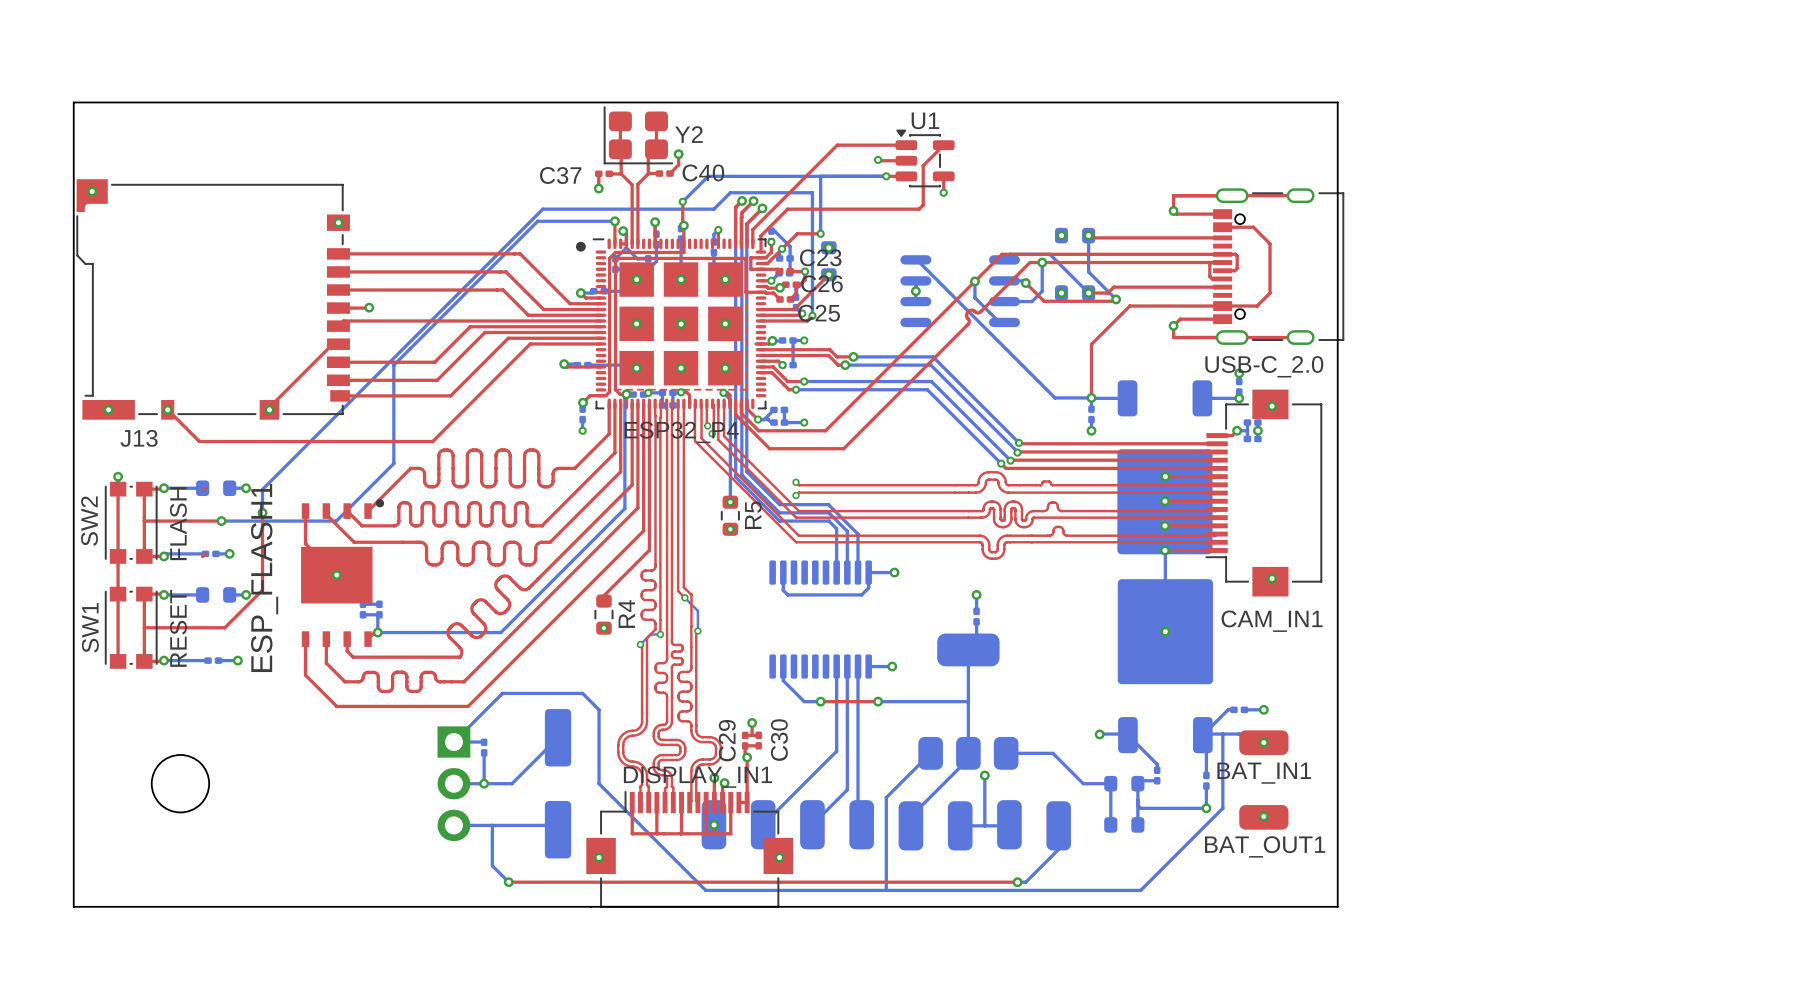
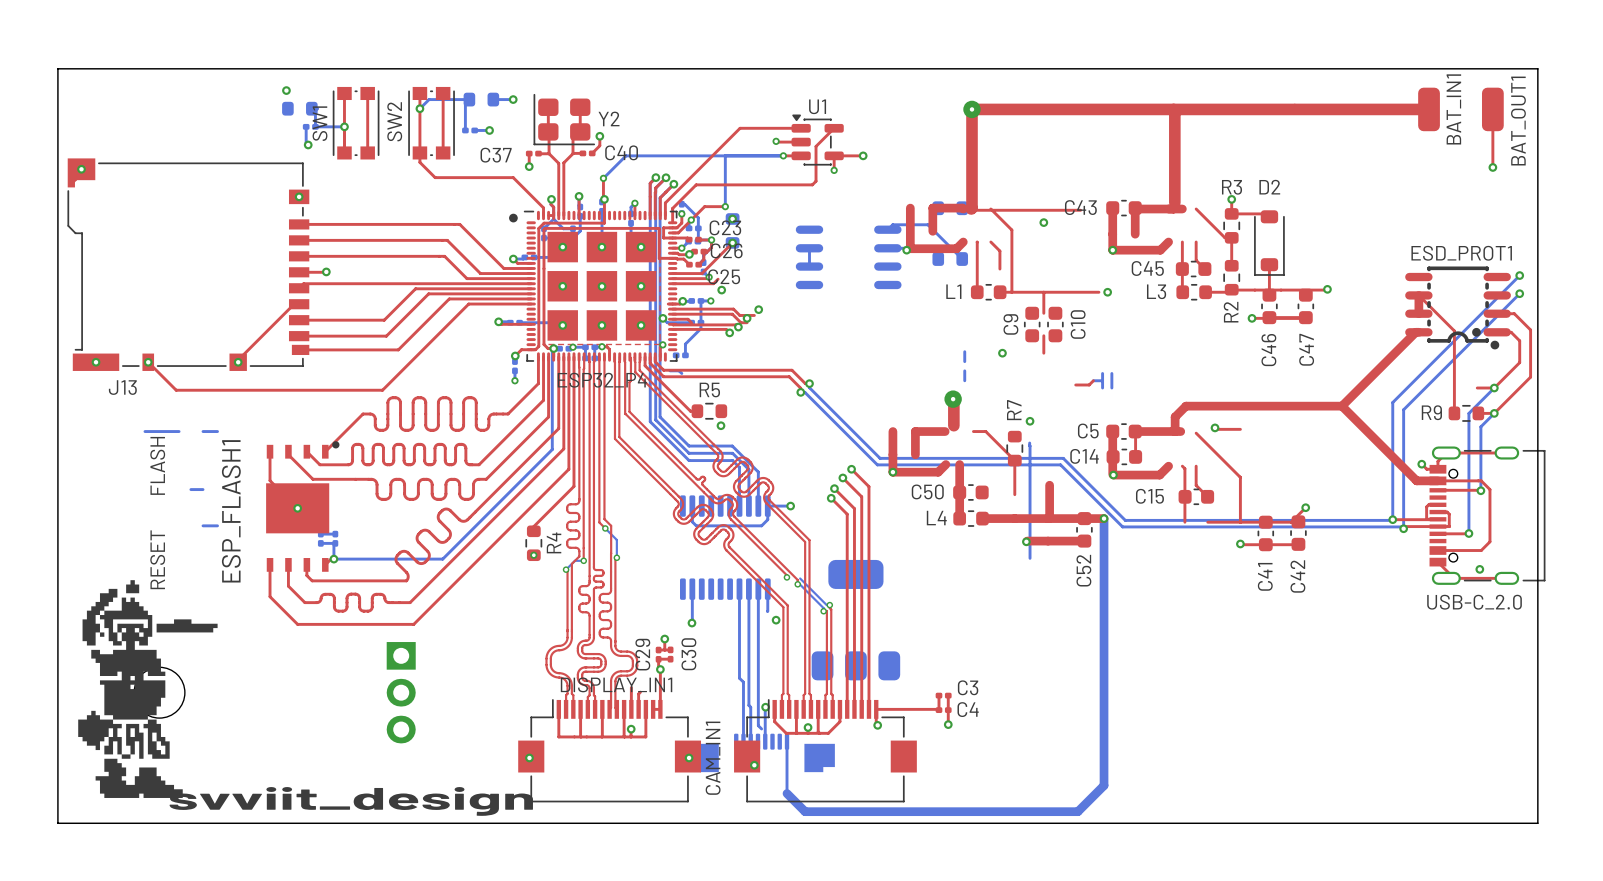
board edge: (73, 102) (73, 906) (1337, 906) (1337, 102) (73, 102) -> (57, 68) (57, 823) (1537, 823) (1537, 68) (57, 68)
via: none -> (286, 90)
top track: none -> (344, 93) (344, 152)
top track: none -> (367, 93) (367, 152)
top track: none -> (443, 93) (443, 152)
part: none -> (481, 99)
bottom track: none -> (493, 99) (513, 99)
via: none -> (513, 99)
part: none -> (299, 108)
bottom track: none -> (317, 108) (315, 110) (315, 126) (344, 126)
bottom track: none -> (419, 108) (429, 99) (469, 99) (465, 103) (465, 130)
via: none -> (419, 108)
via: none -> (971, 109)
top track: none -> (1173, 109) (1174, 202)
top track: none -> (1298, 109) (1429, 109) (971, 109) (971, 209)
top track: none -> (1492, 123) (1492, 167)
bottom track: none -> (306, 126) (306, 142) (308, 144)
part: none -> (310, 126)
via: none -> (344, 126)
part: none -> (470, 130)
via: none -> (489, 130)
via: none -> (308, 144)
top track: none -> (834, 155) (863, 155)
via: none -> (863, 155)
via: none -> (1492, 167)
top track: (1300, 195) (1173, 195) (1173, 210) (1176, 214) (1222, 214) -> none
via: (1173, 210) -> none
top track: (614, 221) (614, 235) -> (419, 93) (419, 162) (435, 177) (513, 177) (543, 207)
bottom track: (614, 221) (537, 221) (393, 365) (393, 463) (336, 521) (221, 521) -> none
via: (614, 221) -> none
via: none -> (551, 199)
top track: none -> (1231, 199) (1231, 213) (1266, 213) (1269, 216)
via: none -> (1231, 199)
top track: (1222, 227) (1253, 227) (1270, 243) (1270, 293) (1257, 306) (1129, 306) (1091, 344) (1091, 397) -> none
via: (623, 231) -> none
top track: none -> (910, 208) (910, 248) (956, 248) (963, 242)
via: (1061, 235) -> none
bottom track: (1088, 235) (1088, 271) (1116, 299) -> none
via: (1088, 235) -> none
top track: none -> (1112, 208) (1112, 250) (1160, 250) (1168, 242)
C43: none -> (1123, 208)
top track: none -> (963, 209) (932, 208) (932, 231)
top track: none -> (990, 209) (1011, 230) (1011, 292)
top track: none -> (1182, 209) (1135, 208) (1135, 234)
top track: none -> (1196, 209) (1224, 237) (1231, 237) (1231, 265)
via: none -> (1043, 222)
R3: none -> (1231, 225)
bottom track: (915, 259) (1055, 397) (1127, 398) -> none
bottom track: (1042, 262) (1042, 291) (1031, 301) (1004, 301) -> none
via: (1042, 262) -> none
top track: (1209, 262) (1209, 276) (1212, 278) (1222, 278) -> none
top track: (1222, 262) (1029, 262) (980, 312) (971, 310) (967, 312) (968, 324) (843, 448) (769, 448) (735, 414) (735, 410) -> (800, 392) (800, 388) (789, 376) (663, 376) (650, 363)
USB-C_2.0 position: (1278, 266) -> (1487, 515)
top track: (1222, 270) (1234, 270) (1237, 268) (1237, 256) (1235, 254) (1002, 254) (825, 430) (758, 430) (741, 413) (741, 409) -> (809, 383) (805, 383) (791, 370) (663, 370) (655, 361)
top track: none -> (990, 242) (999, 251) (999, 269)
top track: none -> (1182, 242) (1182, 292)
top track: none -> (1196, 242) (1196, 260) (1204, 269)
top track: none -> (977, 242) (977, 292)
D2: none -> (1269, 243)
bottom track: (974, 281) (974, 297) (999, 322) (1004, 322) -> none
via: (974, 281) -> none
top track: (1025, 283) (1044, 301) (1114, 301) (1116, 299) -> none
via: none -> (1112, 250)
top track: (1222, 287) (1113, 287) (1107, 293) (1088, 293) -> none
via: (915, 291) -> none
via: (1061, 293) -> none
via: (1088, 293) -> none
via: (1116, 299) -> none
top track: none -> (1269, 264) (1269, 290)
C45: none -> (1193, 269)
bottom track: none -> (1519, 275) (1392, 402) (1392, 520) (1125, 520) (1063, 458) (880, 458) (809, 387) (809, 383)
via: none -> (1519, 275)
R2: none -> (1231, 277)
bottom track: (812, 315) (812, 192) (730, 192) (713, 209) (542, 209) (262, 489) (262, 512) -> none
via: (812, 315) -> none
top track: (1222, 319) (1180, 319) (1173, 325) (1173, 337) (1300, 337) -> none
via: (1173, 325) -> none
top track: none -> (1327, 289) (1231, 289) (1229, 292) (1205, 292)
via: none -> (1327, 289)
via: none -> (721, 290)
L1: none -> (988, 292)
top track: none -> (1000, 292) (1098, 292)
top track: none -> (1043, 292) (1043, 313)
via: none -> (1107, 292)
L3: none -> (1194, 292)
bottom track: none -> (1519, 293) (1403, 409) (1403, 528) (1401, 526) (1122, 526) (1060, 464) (877, 464) (804, 392) (800, 392)
via: none -> (1519, 293)
C46: none -> (1269, 306)
C47: none -> (1305, 306)
ESD_PROT1: none -> (1458, 307)
via: none -> (758, 309)
top track: none -> (1418, 313) (1418, 295) (1454, 330) (1454, 413)
top track: none -> (1497, 313) (1514, 313) (1530, 329) (1530, 377) (1494, 413) (1478, 413)
bottom track: (853, 356) (933, 356) (1019, 442) -> none
via: (853, 356) -> none
top track: none -> (1269, 317) (1305, 317) (1252, 318)
bottom track: none -> (662, 318) (667, 322) (691, 322)
via: none -> (662, 318)
via: none -> (747, 318)
via: none -> (1252, 318)
via: (782, 365) -> none
bottom track: none -> (700, 322) (700, 328) (685, 344)
bottom track: (845, 365) (930, 365) (1017, 452) -> none
via: (845, 365) -> none
top track: (761, 366) (773, 366) (787, 381) (804, 381) -> (672, 324) (736, 324) (738, 327)
C9: none -> (1032, 324)
C10: none -> (1055, 324)
via: none -> (738, 327)
top track: (771, 372) (789, 389) (796, 389) -> (682, 329) (726, 329) (729, 332)
via: (1239, 373) -> none
top track: none -> (1418, 332) (1415, 332) (1341, 406)
top track: none -> (1497, 332) (1511, 332) (1519, 340) (1519, 362) (1494, 388) (1477, 388)
via: none -> (729, 332)
top track: none -> (1043, 335) (1043, 353)
bottom track: (804, 381) (931, 381) (1010, 460) -> none
via: (804, 381) -> none
part: (1239, 386) -> none
bottom track: (796, 389) (927, 389) (1001, 463) -> none
via: (796, 389) -> none
via: none -> (662, 344)
top track: (723, 392) (729, 395) (729, 403) -> (697, 411) (690, 411) (645, 365) (645, 356)
bottom track: (723, 392) (730, 399) (730, 502) -> none
via: (723, 392) -> none
bottom track: (1239, 392) (1239, 398) (1202, 398) -> none
via: (1091, 397) -> none
via: (1239, 398) -> none
via: none -> (1002, 353)
part: none -> (680, 355)
top track: (695, 403) (694, 441) (796, 542) (980, 542) (982, 544) (984, 555) (991, 558) (1001, 556) (1006, 542) (1217, 542) -> (614, 356) (614, 438) (678, 501) (678, 505) (673, 513) (678, 521) (686, 523) (701, 509) (705, 509) (708, 515) (694, 530) (695, 539) (701, 543) (706, 543) (721, 530) (725, 530) (729, 535) (724, 543) (725, 549) (783, 607) (781, 709)
top track: (701, 403) (701, 438) (798, 535) (980, 535) (987, 540) (989, 551) (994, 552) (997, 550) (999, 540) (1003, 536) (1050, 535) (1056, 526) (1061, 527) (1063, 533) (1067, 535) (1215, 535) (1217, 534) -> (619, 356) (619, 437) (681, 499) (682, 505) (678, 513) (681, 518) (685, 518) (699, 505) (708, 506) (712, 511) (712, 517) (699, 531) (699, 536) (705, 539) (720, 525) (728, 526) (733, 535) (728, 543) (729, 546) (787, 605) (789, 709)
top track: (747, 403) (747, 408) (757, 419) -> (660, 356) (660, 347) (662, 344)
via: (1272, 406) -> none
top track: (706, 409) (707, 425) -> (624, 361) (625, 414) (713, 501) (720, 503) (727, 499) (731, 502) (732, 505) (728, 512) (730, 518) (786, 577)
top track: (718, 409) (718, 439) (796, 517) (982, 517) (987, 515) (991, 508) (994, 509) (995, 523) (1001, 527) (1010, 523) (1012, 508) (1015, 509) (1016, 523) (1023, 527) (1029, 525) (1033, 517) (1217, 517) -> (634, 361) (635, 372) (717, 454) (718, 457) (713, 465) (715, 471) (720, 475) (725, 475) (740, 462) (744, 462) (748, 468) (735, 482) (735, 491) (740, 496) (746, 496) (761, 483) (765, 483) (768, 488) (764, 495) (765, 501) (805, 541) (803, 709)
top track: (724, 409) (724, 436) (798, 511) (982, 511) (986, 503) (992, 501) (999, 505) (1000, 519) (1003, 520) (1005, 505) (1014, 501) (1020, 505) (1022, 519) (1024, 520) (1029, 512) (1045, 510) (1051, 502) (1056, 503) (1058, 509) (1061, 511) (1215, 511) (1217, 509) -> (640, 361) (639, 370) (720, 451) (722, 457) (718, 465) (718, 468) (724, 471) (739, 458) (747, 459) (751, 464) (752, 469) (738, 484) (739, 488) (745, 492) (759, 478) (768, 479) (773, 488) (769, 499) (809, 540) (810, 709)
bottom track: (773, 409) (764, 419) -> none
part: (779, 409) -> none
bottom track: (784, 409) (784, 422) -> (685, 344) (685, 355)
part: (1091, 414) -> none
via: (758, 419) -> none
part: (779, 422) -> none
bottom track: (787, 422) (804, 422) -> (474, 130) (489, 130)
via: (804, 422) -> none
part: (1252, 422) -> none
via: (707, 425) -> none
via: (1091, 430) -> none
via: (1237, 430) -> none
via: (1257, 430) -> none
top track: none -> (629, 383) (629, 411) (697, 479) (704, 477) (705, 479) (702, 484) (715, 498) (728, 494) (734, 499) (737, 505) (733, 512) (733, 516) (797, 580) (797, 584)
via: (712, 433) -> none
via: none -> (809, 383)
C3 side: bottom (1252, 438) -> top (943, 695)
bottom track: none -> (1494, 388) (1468, 413) (1468, 533)
via: none -> (1494, 388)
top track: (1019, 442) (1217, 443) -> none
via: (1019, 442) -> none
via: none -> (800, 392)
top track: none -> (953, 399) (953, 425)
via: none -> (953, 399)
top track: (1217, 451) (1017, 452) -> none
via: (1017, 452) -> none
top track: none -> (1341, 406) (1186, 406) (1175, 417) (1175, 431)
top track: none -> (1341, 406) (1416, 480) (1481, 480) (1489, 489) (1489, 541) (1481, 550) (1437, 550)
via: (1010, 460) -> none
top track: (1217, 460) (1010, 460) -> none
top track: (1001, 463) (1006, 468) (1217, 468) -> none
via: (1001, 463) -> none
part: (1164, 467) -> none
R9: none -> (1466, 413)
bottom track: none -> (1494, 413) (1480, 426) (1480, 490)
via: none -> (1494, 413)
top track: (118, 476) (118, 661) -> none
via: (118, 476) -> none
top track: (1165, 476) (1217, 476) -> none
via: none -> (720, 425)
top track: (796, 482) (798, 485) (975, 485) (983, 473) (995, 472) (1002, 475) (1008, 485) (1040, 485) (1044, 481) (1049, 481) (1052, 485) (1217, 484) -> none
via: (796, 482) -> none
top track: none -> (1215, 427) (1240, 429)
via: none -> (1215, 427)
top track: (164, 488) (144, 489) (144, 556) (164, 556) -> none
via: (164, 488) -> none
top track: (205, 488) (204, 489) -> none
part: (216, 488) -> none
via: (246, 488) -> none
top track: none -> (892, 431) (892, 472) (938, 472) (945, 465)
top track: none -> (945, 431) (915, 431) (915, 454)
top track: none -> (973, 431) (985, 431) (1014, 460) (1014, 494)
top track: none -> (1113, 431) (1113, 475) (1159, 475) (1168, 466)
C5: none -> (1123, 431)
top track: none -> (1182, 433) (1180, 431) (1135, 431) (1135, 456)
top track: none -> (1196, 433) (1240, 477)
top track: (1217, 493) (1007, 492) (1000, 488) (997, 480) (988, 479) (982, 489) (976, 492) (798, 492) (796, 495) -> none
CAM_IN1 rotation: 0° (1263, 493) -> 90° clockwise (825, 750)
CAM_IN1 position: (1263, 493) -> (825, 750)
via: (796, 495) -> none
top track: (1164, 501) (1217, 501) -> none
via: (1164, 501) -> none
via: (730, 502) -> none
R7: none -> (1014, 448)
top track: (262, 512) (262, 590) (224, 627) (144, 627) -> none
via: (262, 512) -> none
top track: none -> (1506, 453) (1446, 453) (1437, 461) (1437, 469) (1426, 469) (1421, 464)
R5 rotation: 0° (730, 515) -> 90° clockwise (709, 411)
R5 position: (730, 515) -> (709, 411)
R5 name position: R5 (753, 515) -> R5 (709, 390)
C14: none -> (1124, 456)
top track: (144, 521) (221, 521) -> none
via: (221, 521) -> none
SW2 position: (131, 522) -> (431, 123)
top track: none -> (959, 464) (959, 518)
top track: (1164, 525) (1217, 525) -> none
via: (1164, 525) -> none
via: none -> (1421, 464)
top track: none -> (1182, 466) (1184, 468) (1184, 522)
top track: none -> (1196, 466) (1196, 485) (1207, 496)
via: (730, 529) -> none
top track: none -> (851, 469) (868, 486) (868, 709)
via: none -> (851, 469)
via: none -> (892, 472)
via: none -> (1113, 475)
top track: none -> (1240, 477) (1240, 522)
top track: none -> (842, 477) (861, 496) (861, 709)
via: none -> (842, 477)
top track: none -> (1049, 485) (1049, 516) (1048, 518)
top track: (1164, 550) (1165, 553) (1168, 550) (1217, 550) -> none
via: (1164, 550) -> none
top track: none -> (834, 488) (854, 508) (854, 709)
via: none -> (834, 488)
top track: (205, 553) (202, 556) -> none
bottom track: (205, 553) (166, 553) (164, 556) -> none
part: (210, 553) -> none
via: (229, 553) -> none
top track: none -> (1437, 490) (1480, 490)
via: none -> (1480, 490)
via: (164, 556) -> none
C50: none -> (970, 492)
C15: none -> (1196, 496)
top track: none -> (831, 498) (847, 514) (847, 709)
via: none -> (831, 498)
top track: none -> (1437, 504) (1428, 504) (1426, 506) (1426, 519) (1437, 519)
top track: none -> (1305, 507) (1291, 522) (1207, 522)
via: none -> (1305, 507)
via: (1272, 578) -> none
top track: none -> (1437, 512) (1447, 512) (1449, 514) (1449, 526) (1404, 526) (1403, 528)
L4: none -> (971, 518)
top track: none -> (982, 518) (1104, 518)
bottom track: none -> (1104, 518) (1104, 785) (1077, 811) (805, 811) (787, 793) (787, 741)
via: none -> (1104, 518)
via: none -> (1392, 519)
top track: none -> (1429, 519) (1392, 519)
top track: (164, 594) (144, 594) (144, 661) (164, 660) -> none
bottom track: (164, 594) (202, 594) -> none
via: (164, 594) -> none
part: (216, 594) -> none
via: (246, 594) -> none
bottom track: (976, 594) (976, 611) -> none
via: (976, 594) -> none
via: none -> (1403, 528)
C52: none -> (1084, 529)
C41: none -> (1265, 533)
C42: none -> (1298, 533)
top track: none -> (1468, 533) (1437, 533)
via: none -> (1468, 533)
top track: none -> (1084, 541) (1026, 541)
top track: none -> (1240, 543) (1298, 544)
via: none -> (1240, 543)
part: (976, 616) -> none
bottom track: (976, 621) (976, 641) (968, 649) (968, 759) (910, 816) (910, 825) -> none
SW1 position: (131, 627) -> (356, 123)
via position: (1165, 631) -> (1026, 541)
top track: none -> (1437, 562) (1454, 578) (1506, 578)
via: none -> (1479, 569)
via: none -> (786, 577)
bottom track: none -> (800, 578) (826, 605)
bottom track: (164, 660) (208, 660) -> none
via: (164, 660) -> none
part: (213, 660) -> none
bottom track: (218, 660) (237, 660) -> none
via: (237, 660) -> none
bottom track: none -> (797, 584) (823, 608) (823, 611)
via: none -> (797, 584)
bottom track: (868, 666) (892, 666) -> (767, 589) (767, 611)
via: (892, 666) -> none
part: (1165, 666) -> none
bottom track: (783, 680) (804, 701) (820, 701) -> (692, 601) (691, 623)
top track: none -> (829, 605) (832, 709)
via: none -> (829, 605)
via: none -> (823, 611)
top track: none -> (826, 611) (825, 709)
top track: (820, 701) (878, 701) -> none
via position: (820, 701) -> (691, 623)
bottom track: (878, 701) (968, 701) -> none
bottom track: (1233, 709) (1228, 709) (1202, 735) (1206, 738) (1206, 775) -> none
part: (1239, 709) -> none
bottom track: (1244, 709) (1263, 709) -> none
via: (1263, 709) -> none
bottom track: (1099, 734) (1126, 734) (1157, 764) (1157, 770) -> none
via: (1099, 734) -> none
bottom track: (1203, 734) (1247, 734) (1255, 742) (1263, 742) -> none
bottom track: (1222, 734) (1222, 808) (1140, 890) (705, 890) (599, 783) (599, 709) (582, 693) (502, 693) (453, 742) (484, 742) -> none
bottom track: (558, 737) (512, 783) (453, 783) -> none
BAT_IN1 rotation: 0° (1263, 742) -> 90° clockwise (1429, 109)
BAT_IN1 position: (1263, 742) -> (1429, 109)
via: (1263, 742) -> none
part: (484, 747) -> none
bottom track: (836, 751) (763, 824) -> (739, 664) (739, 678) (743, 682) (743, 741)
bottom track: (484, 752) (484, 783) -> none
bottom track: (930, 753) (886, 797) (886, 890) -> none
bottom track: (1006, 753) (1052, 753) (1083, 783) (1110, 783) (1110, 824) -> none
BAT_IN1 name position: BAT_IN1 (1264, 773) -> BAT_IN1 (1453, 109)
bottom track: (984, 775) (984, 825) -> none
via: (984, 775) -> none
part: (1157, 775) -> none
via: (714, 777) -> none
svviit_design: none -> (147, 689)
bottom track: (1157, 780) (1140, 780) (1137, 783) (1137, 824) -> none
part: (1206, 780) -> none
via: (484, 783) -> none
part: (558, 783) -> none
via: (724, 783) -> none
part: (1124, 783) -> none
top track: none -> (938, 695) (938, 710) (876, 709) (877, 725)
top track: none -> (948, 695) (948, 724)
bottom track: (1206, 786) (1206, 808) (1140, 808) (1137, 805) -> none
bottom track: (847, 789) (812, 824) -> (748, 698) (750, 741)
bottom track: none -> (765, 707) (765, 741)
via: none -> (765, 707)
top track: none -> (774, 709) (774, 721) (786, 733) (828, 733) (839, 721) (839, 709)
top track: none -> (796, 709) (796, 733)
top track: none -> (818, 709) (819, 733)
C4: none -> (943, 710)
via: (1206, 808) -> none
via: (1263, 816) -> none
BAT_OUT1 rotation: 0° (1263, 817) -> 90° clockwise (1492, 109)
BAT_OUT1 position: (1263, 817) -> (1492, 109)
via: none -> (948, 724)
via: none -> (877, 725)
via: none -> (808, 727)
part: (713, 824) -> none
part: (763, 824) -> none
part: (812, 824) -> none
part: (861, 824) -> none
bottom track: (1009, 824) (960, 825) -> none
part: (1009, 824) -> none
part: (1124, 824) -> none
bottom track: (453, 825) (553, 825) (558, 829) -> none
bottom track: (492, 825) (492, 865) (508, 882) -> none
part: (910, 825) -> none
part: (960, 825) -> none
bottom track: (1058, 825) (1058, 849) (1025, 882) (1017, 882) -> none
part: (1058, 825) -> none
part: none -> (761, 752)
via: none -> (754, 765)
top track: (508, 882) (1017, 882) -> none
via: (508, 882) -> none
via: (1017, 882) -> none

